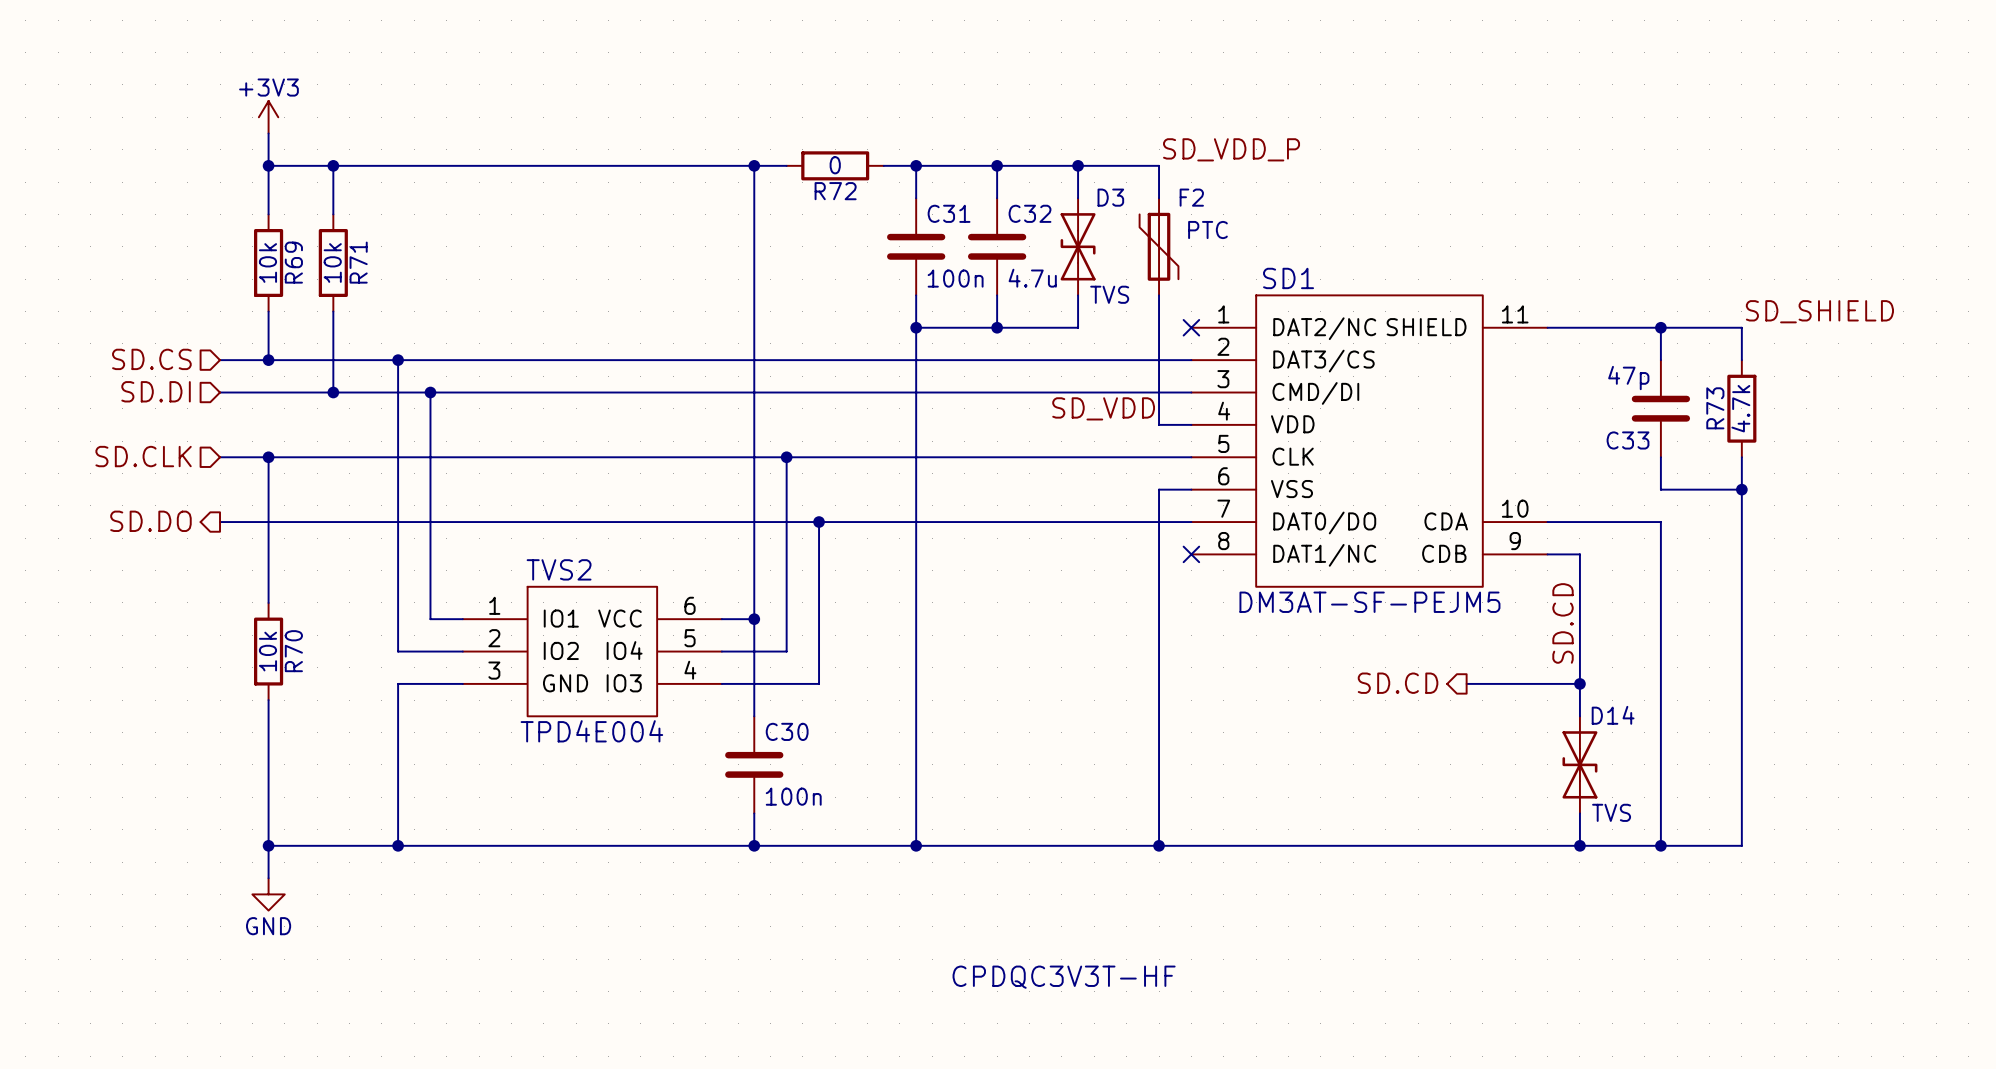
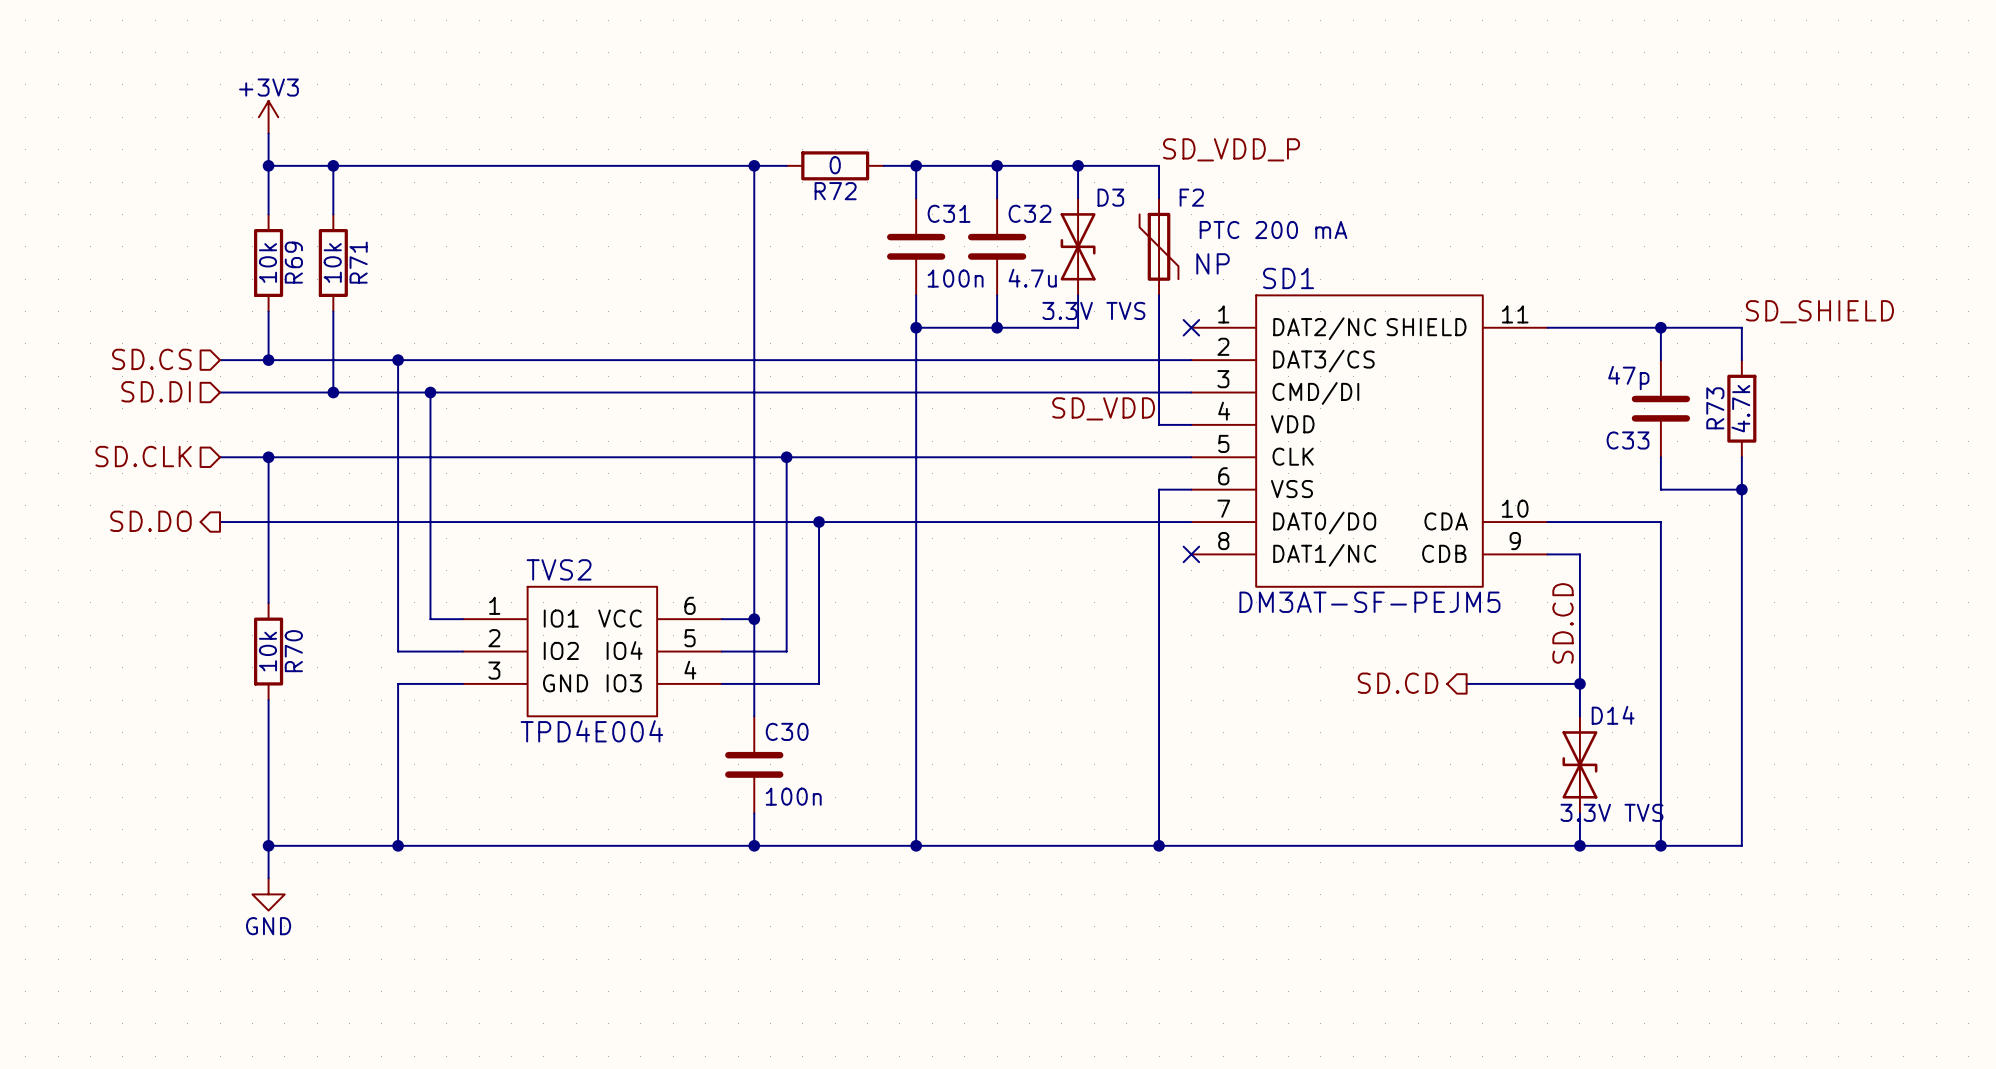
F2 value: PTC (1207, 230) -> PTC 200 mA (1273, 230)
text: none -> NP (1213, 263)
D3 value: TVS (1109, 294) -> 3.3V TVS (1093, 310)
D14 value: TVS (1611, 812) -> 3.3V TVS (1611, 812)
text: CPDQC3V3T-HF (1064, 977) -> none

